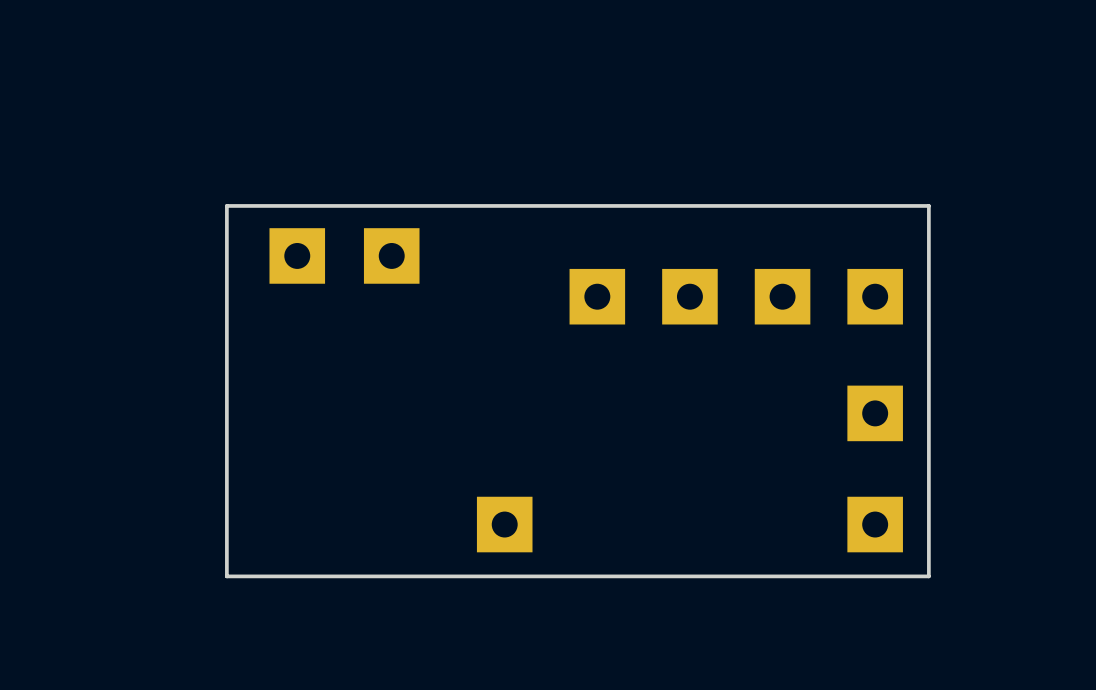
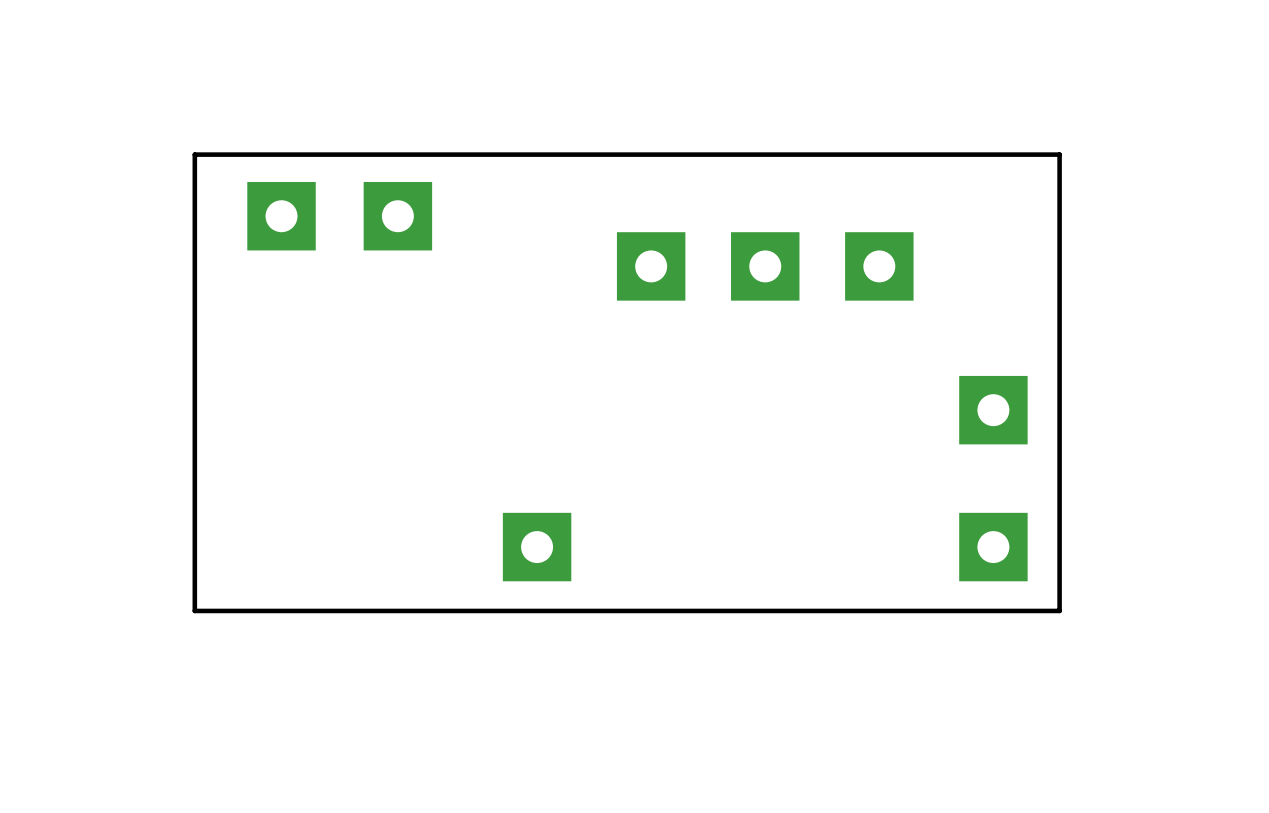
part: (875, 296) -> none

